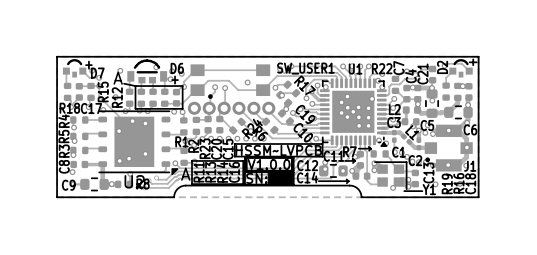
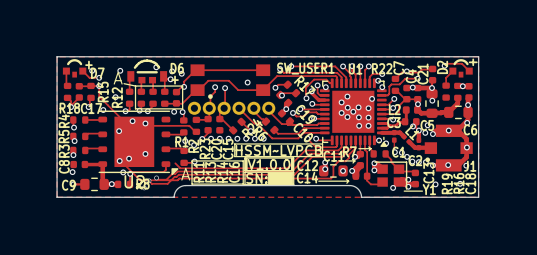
track: (196, 131) (194, 138) (187, 138) (185, 141) -> (196, 131) (189, 125) (146, 125) (142, 129)
via position: (175, 163) -> (123, 172)
track: (176, 180) (168, 187) (144, 187) -> (176, 180) (140, 180) (122, 162)

